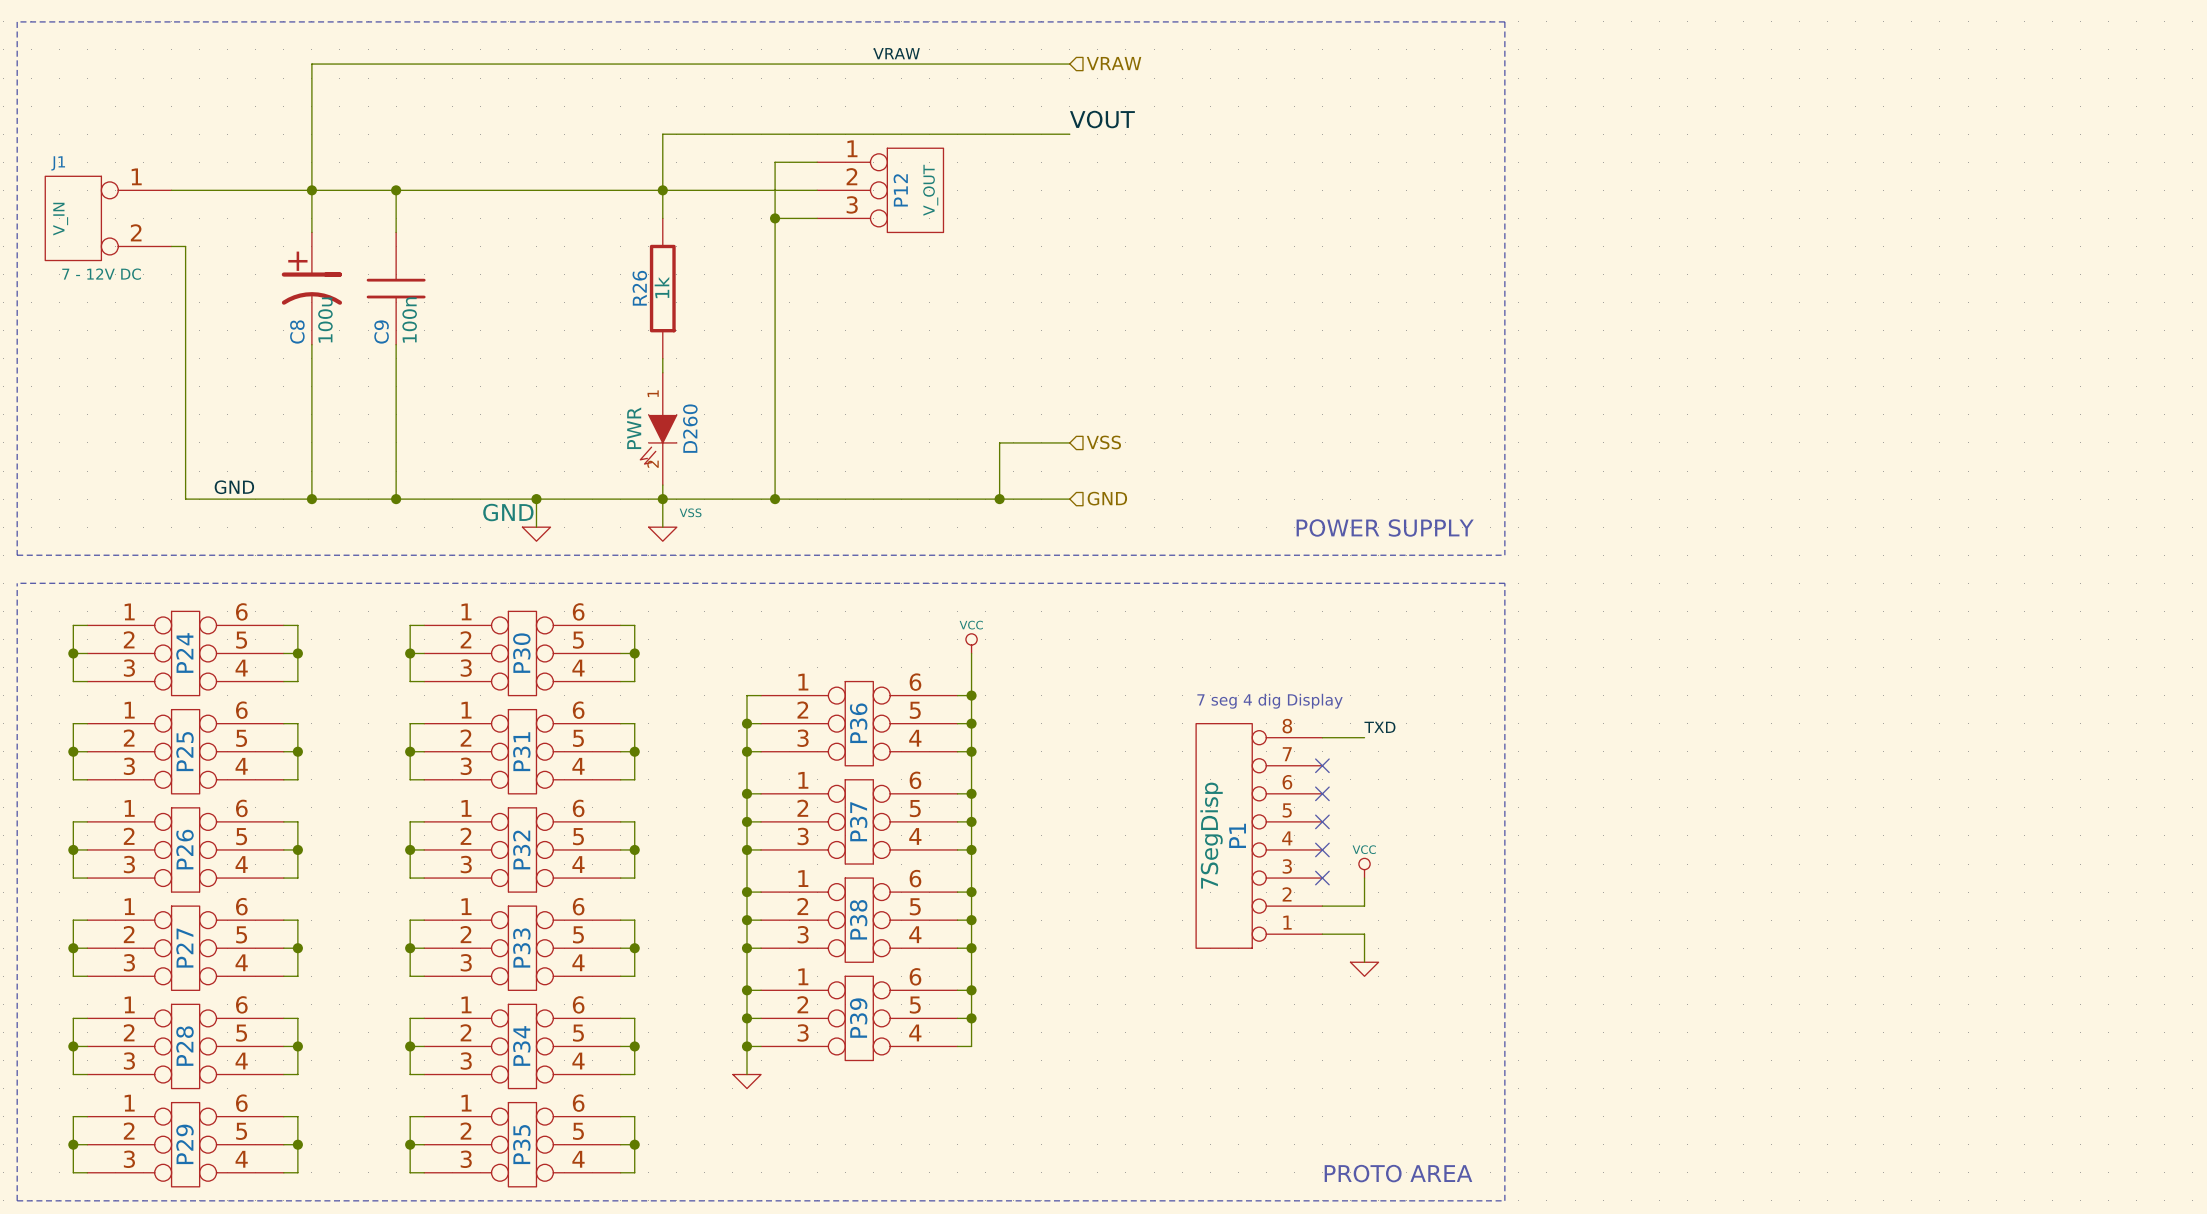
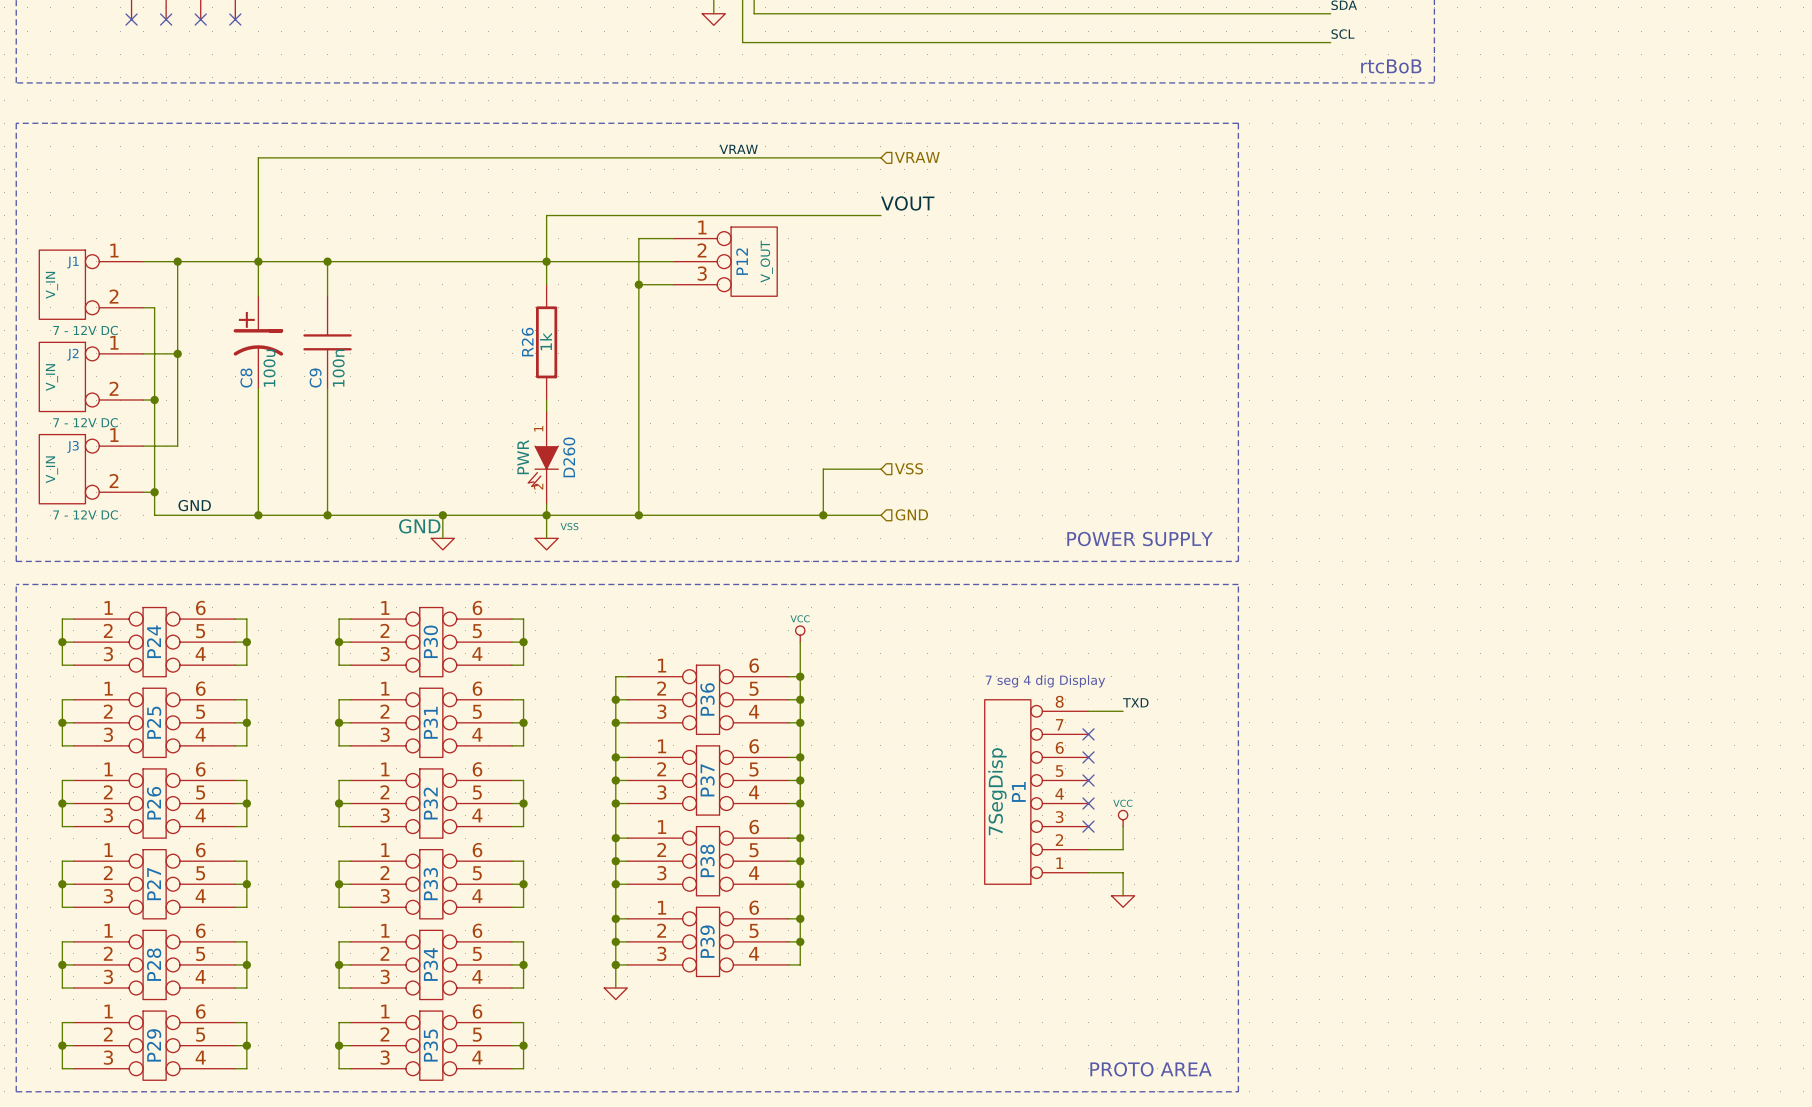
J1 name position: J1 (58, 163) -> J1 (72, 262)
wire: none -> (177, 261) (177, 446) (143, 446)
junction: none -> (177, 261)
wire: none -> (143, 353) (177, 353)
junction: none -> (177, 353)
J2: none -> V_IN (91, 376)
wire: none -> (143, 400) (154, 400)
junction: none -> (154, 400)
J3: none -> V_IN (91, 469)
wire: none -> (143, 492) (154, 492)
junction: none -> (154, 492)

